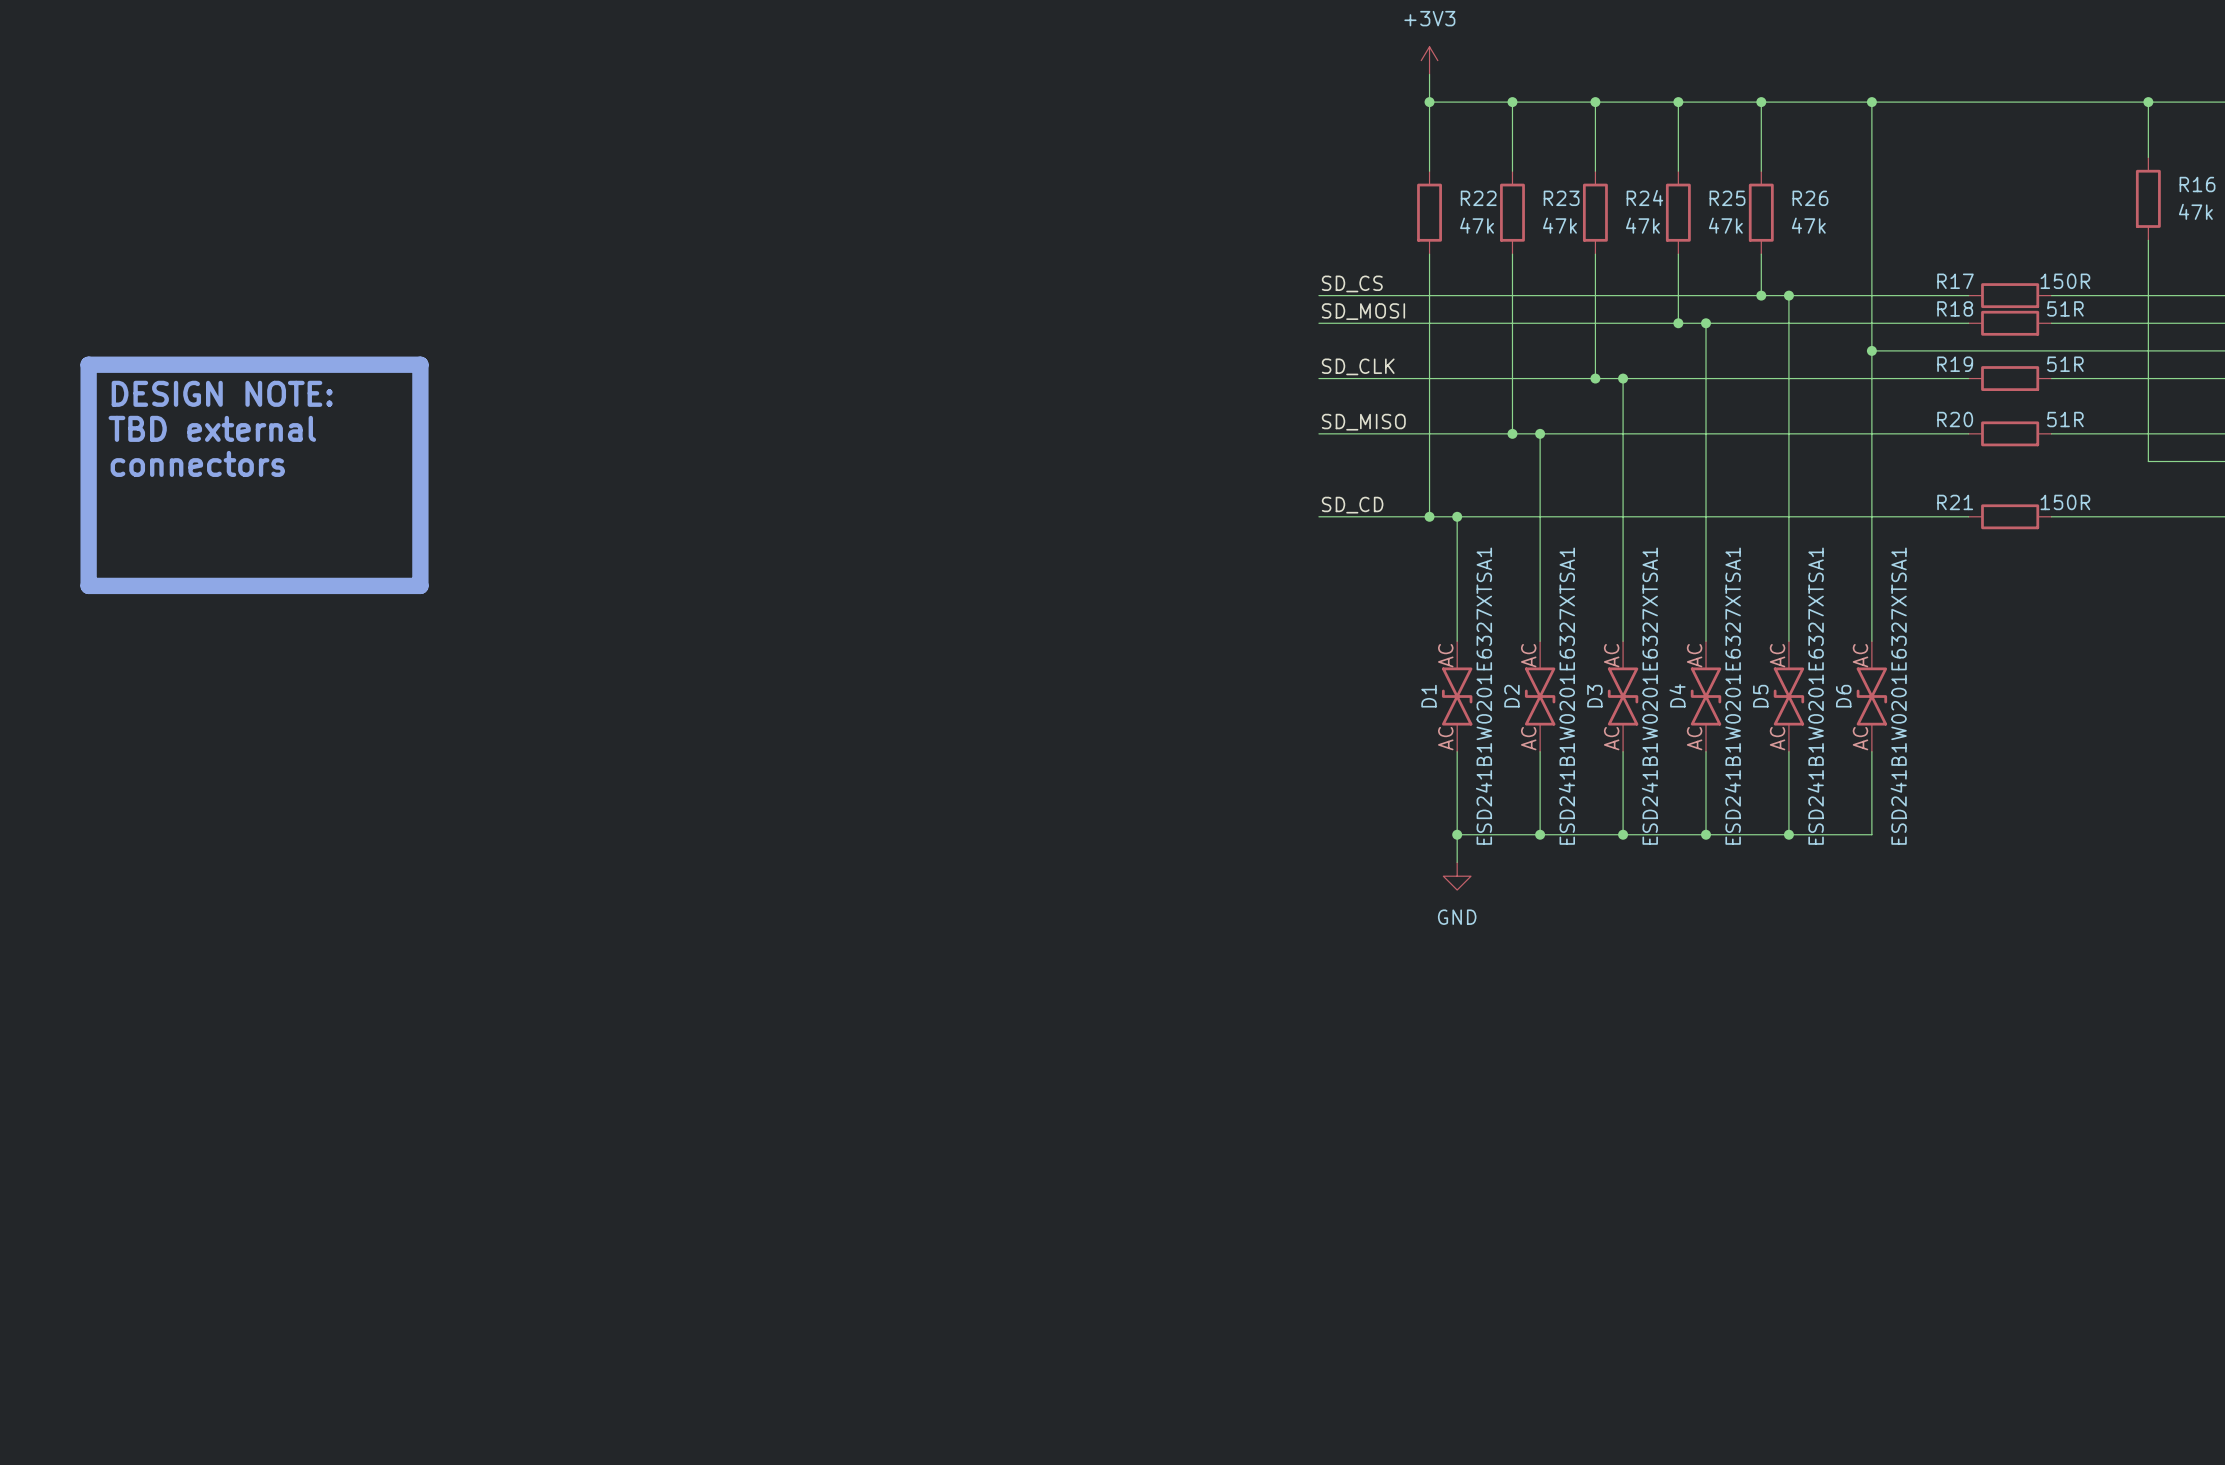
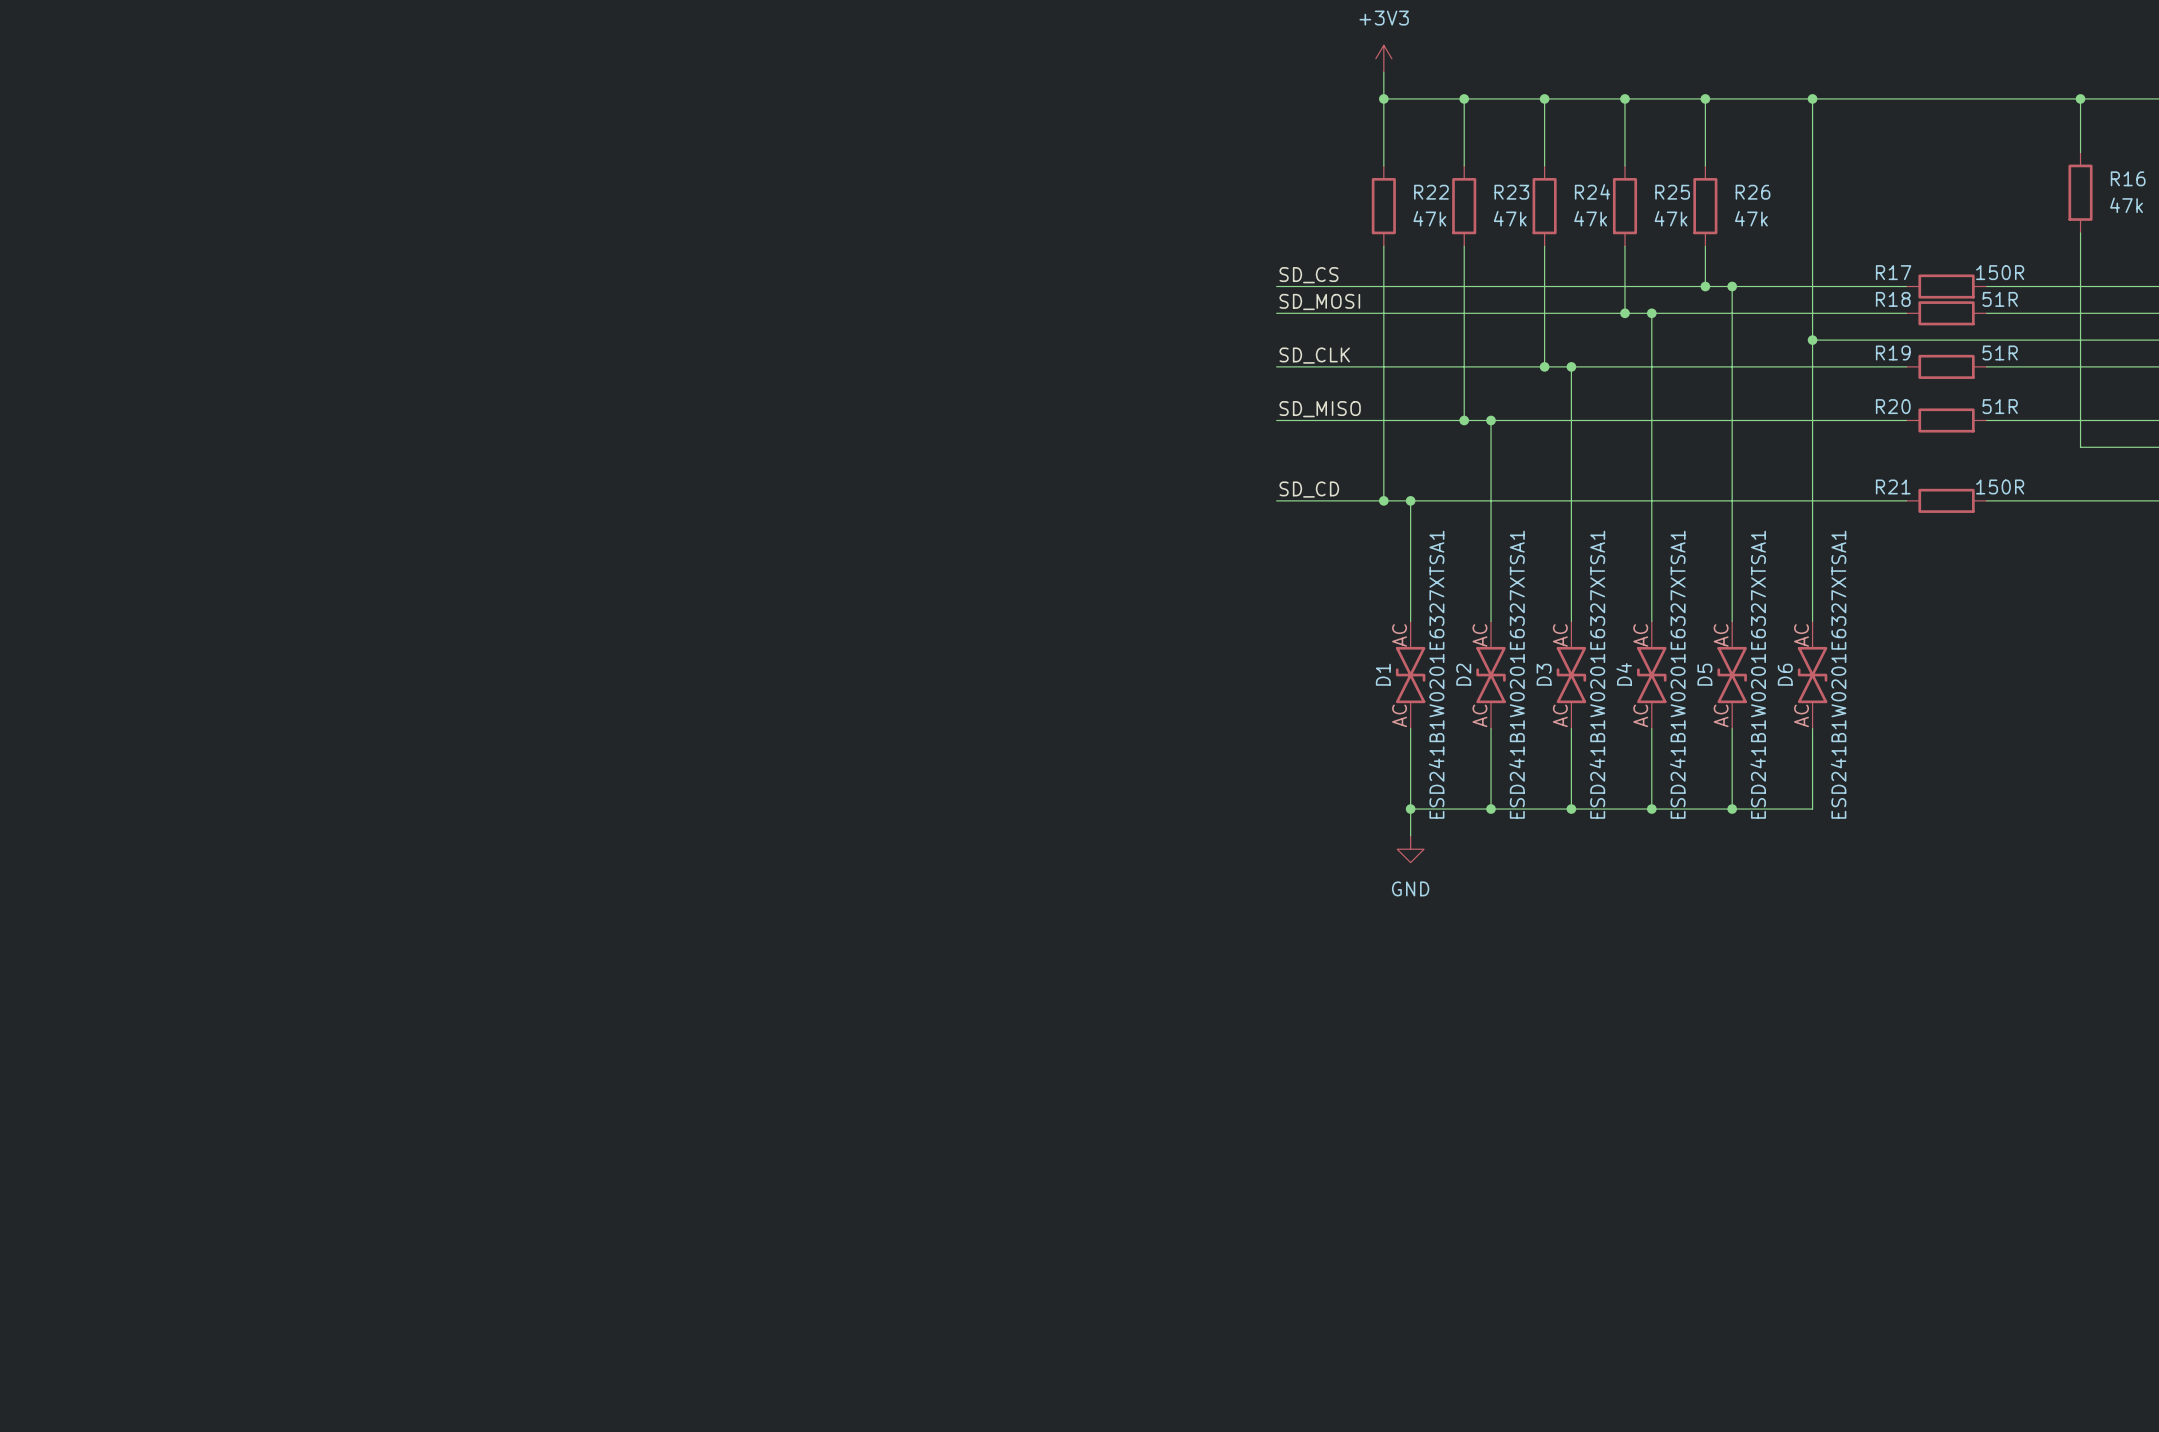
line: (88, 364) (420, 364) (420, 585) (88, 585) (88, 364) -> none
text: DESIGN NOTE: (222, 393) -> none
text: TBD external (212, 428) -> none
text: connectors (197, 463) -> none

